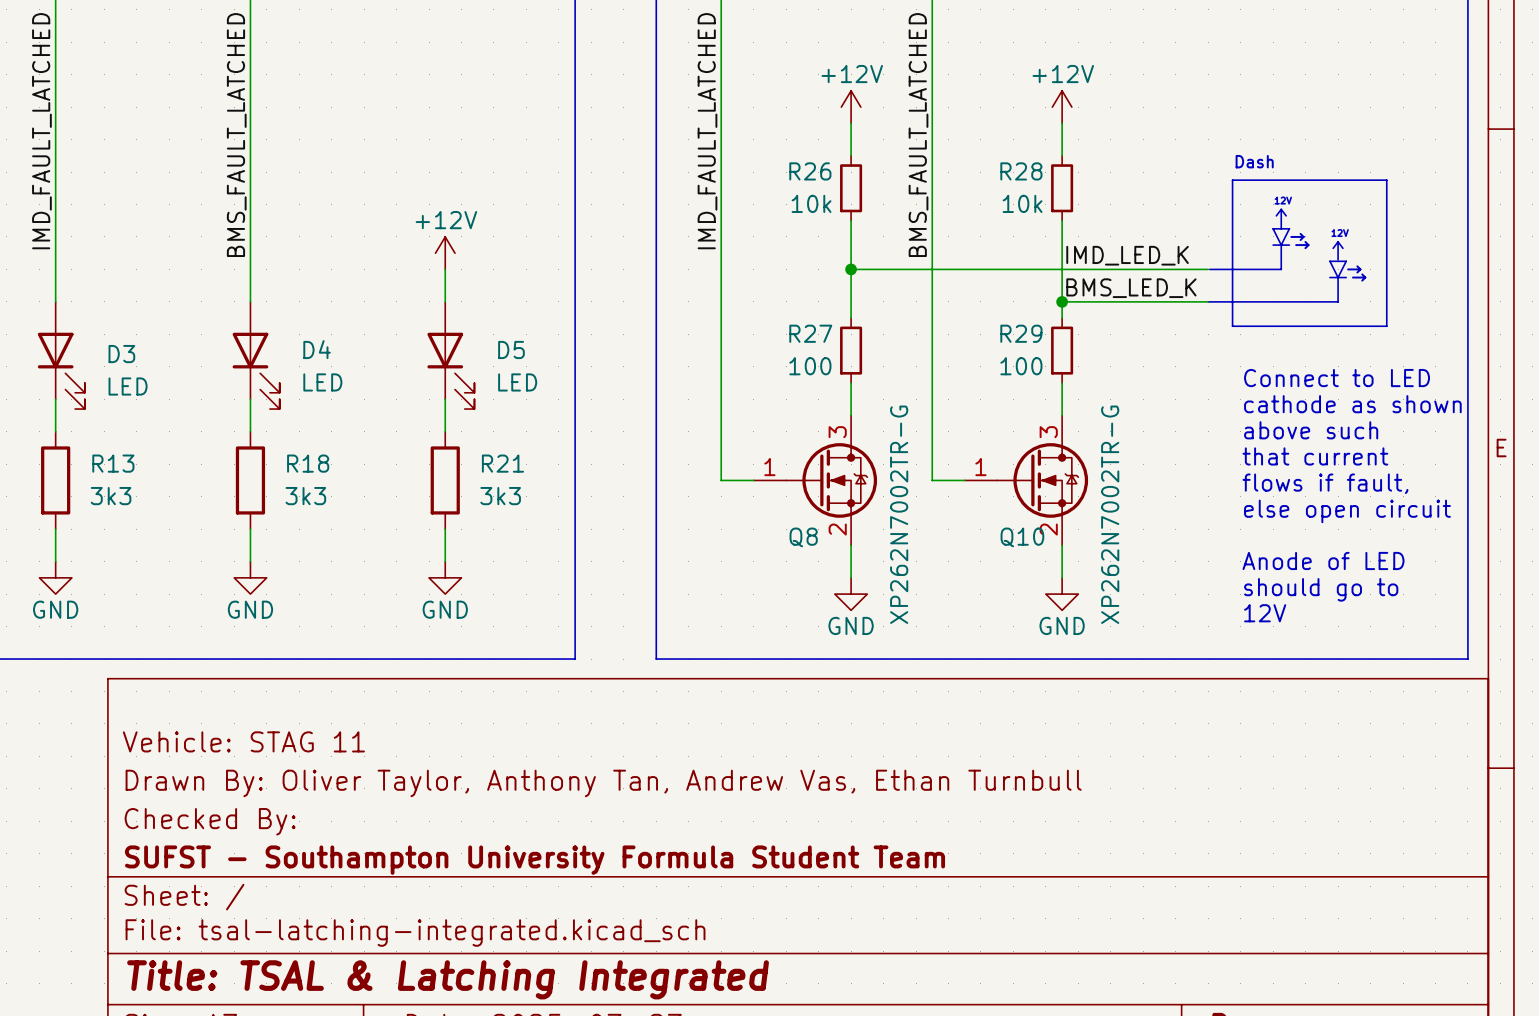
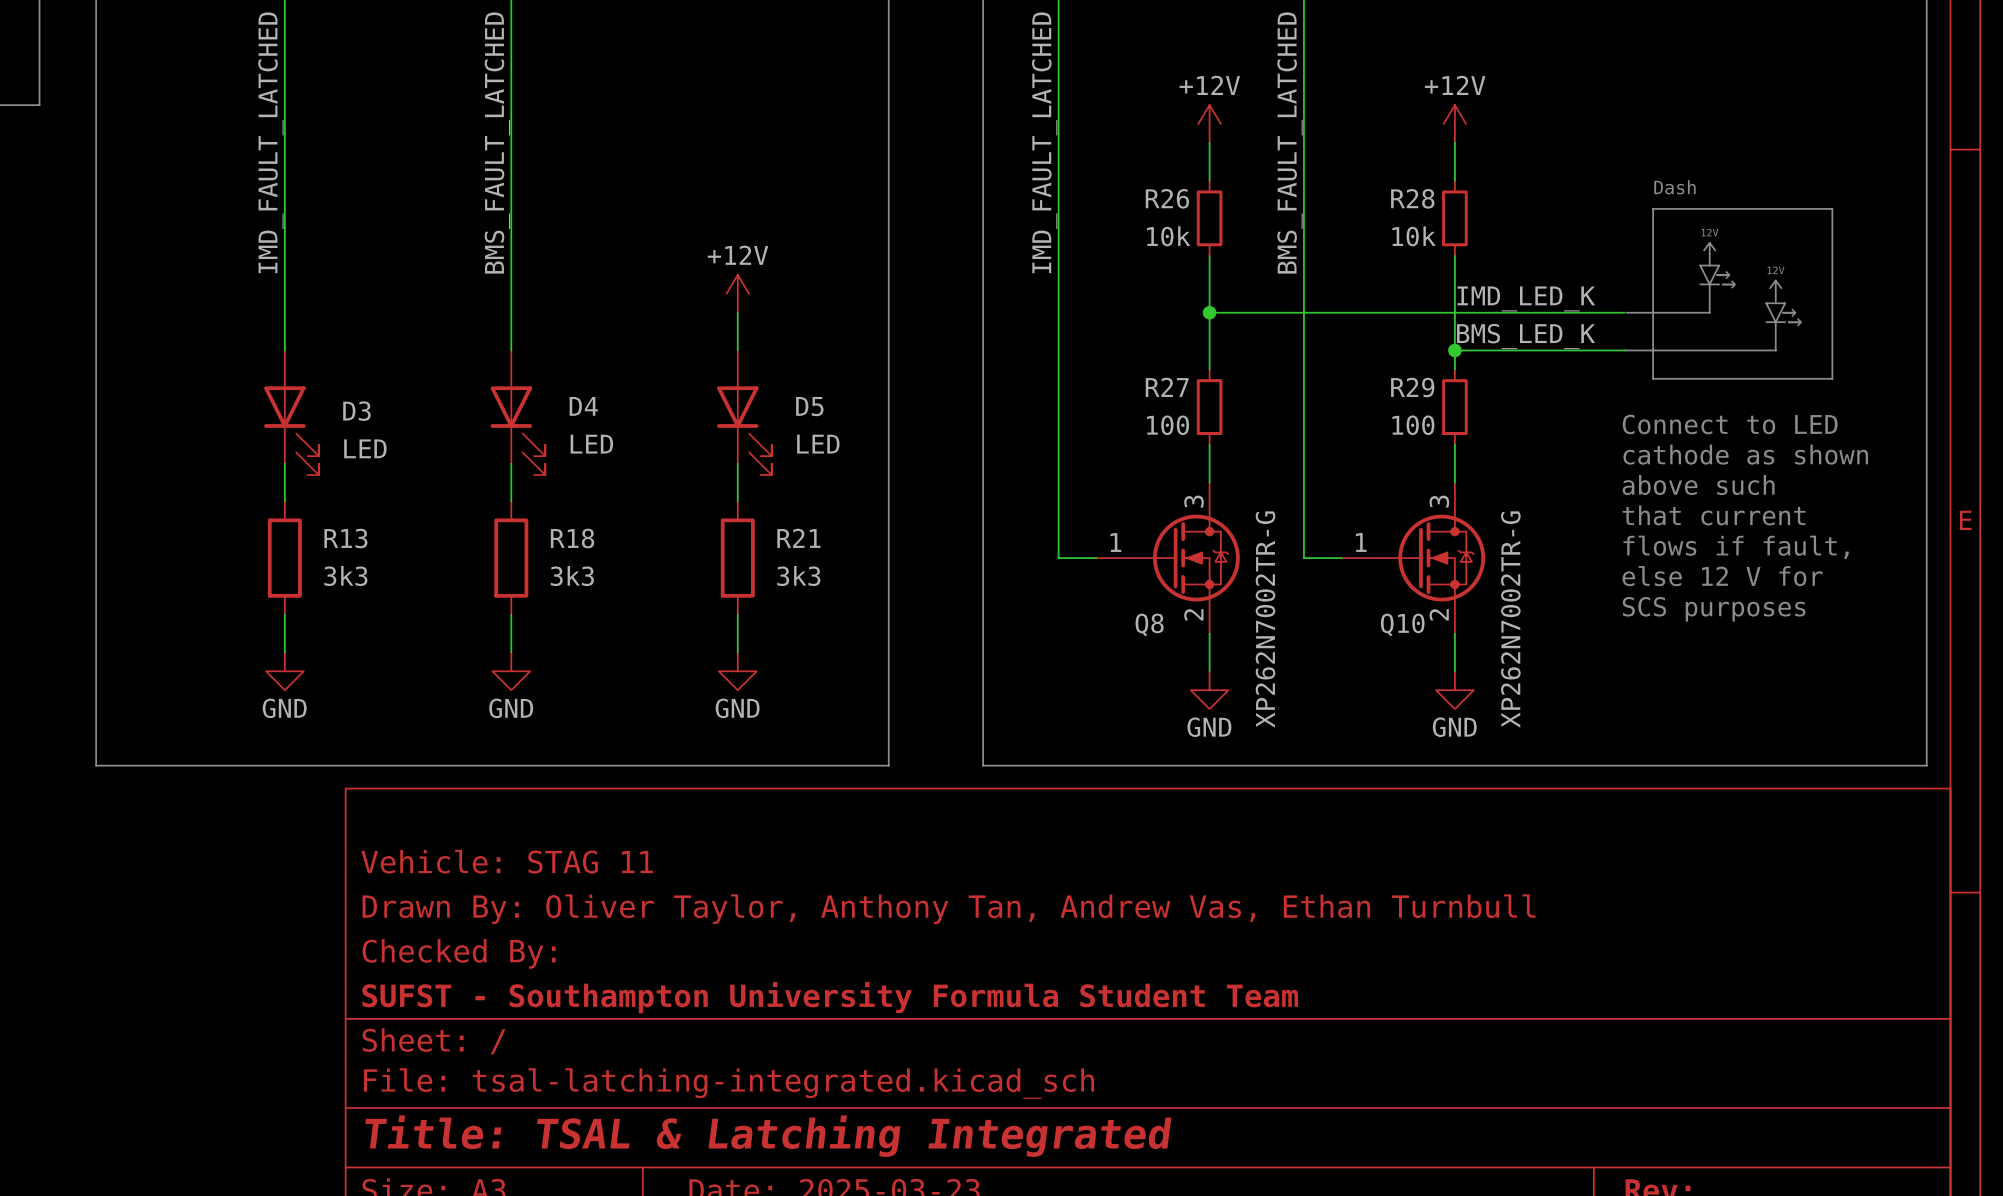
text position: Connect to LED (1337, 378) -> Connect to LED (1730, 424)
text position: cathode as shown (1352, 404) -> cathode as shown (1745, 454)
text position: above such (1311, 430) -> above such (1698, 485)
text position: that current (1315, 456) -> that current (1714, 515)
text position: flows if fault, (1325, 483) -> flows if fault, (1736, 547)
text: none -> else 12 V for (1722, 576)
text: else open circuit (1347, 511) -> none
text: none -> SCS purposes (1714, 609)
text: Anode of LED (1323, 560) -> none
text: should go to (1321, 589) -> none
text: 12V (1265, 613) -> none

